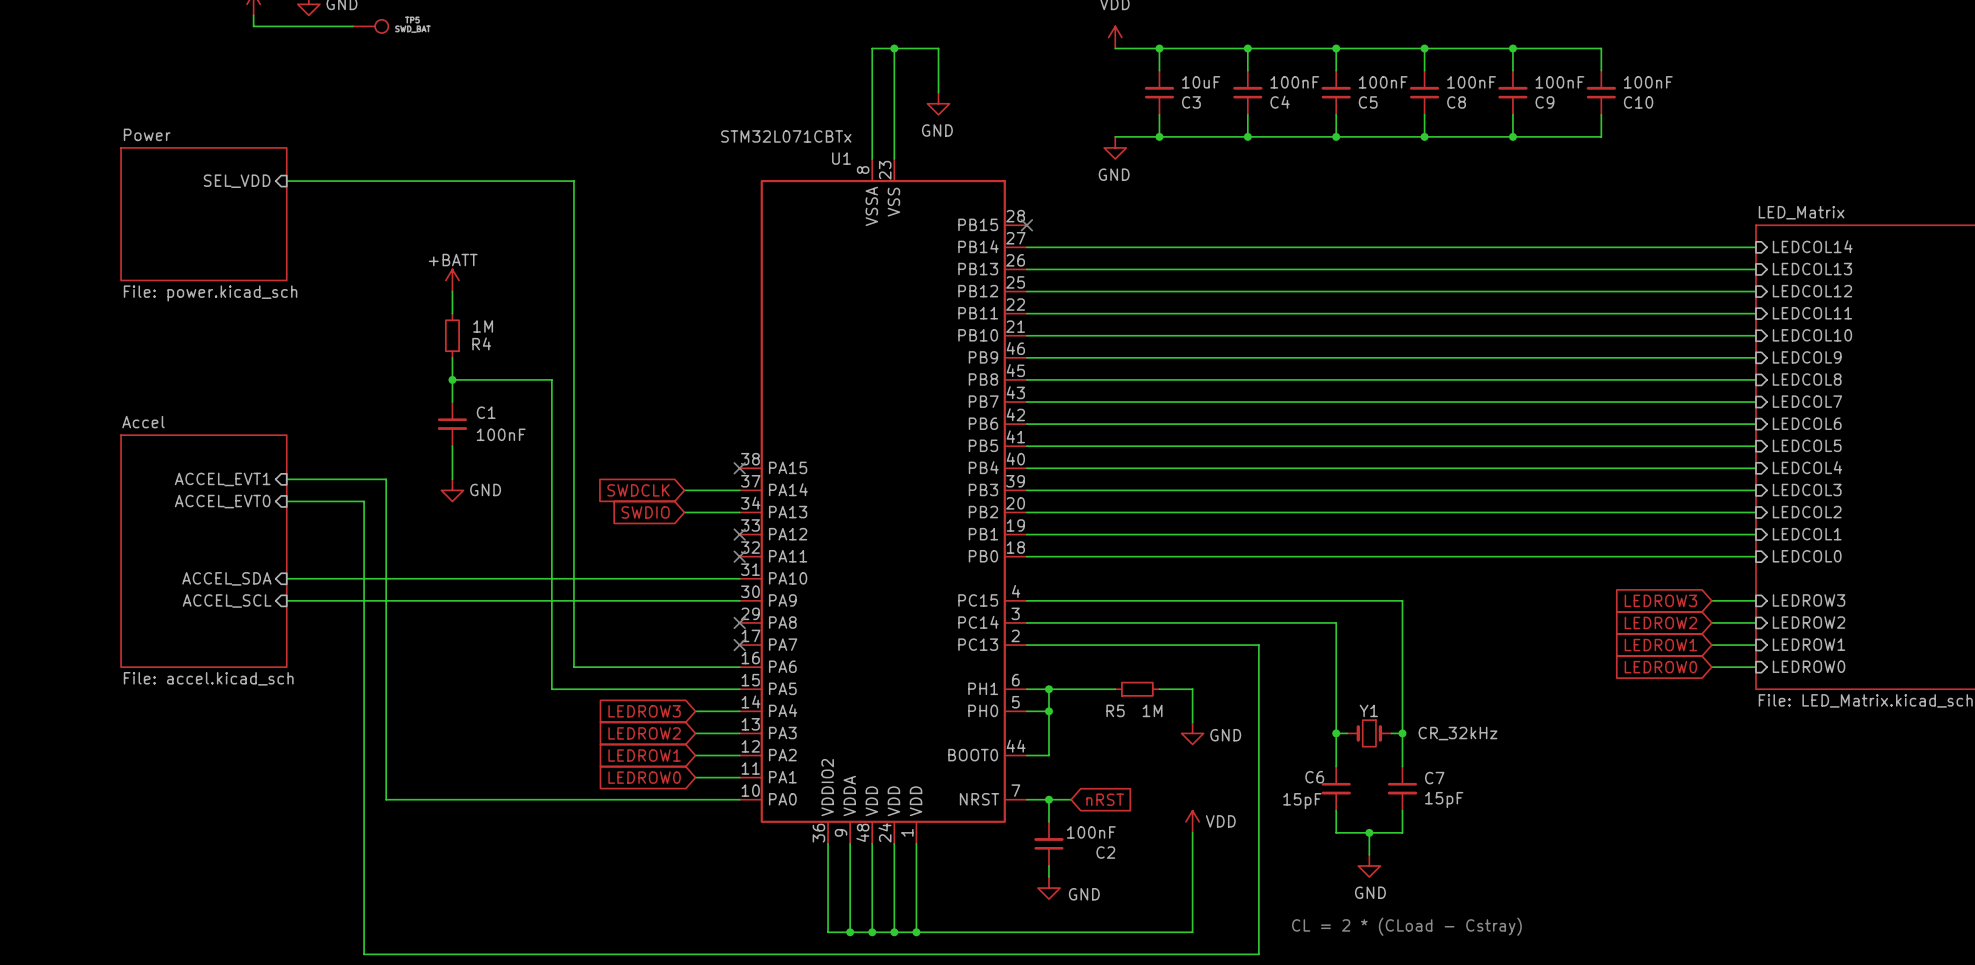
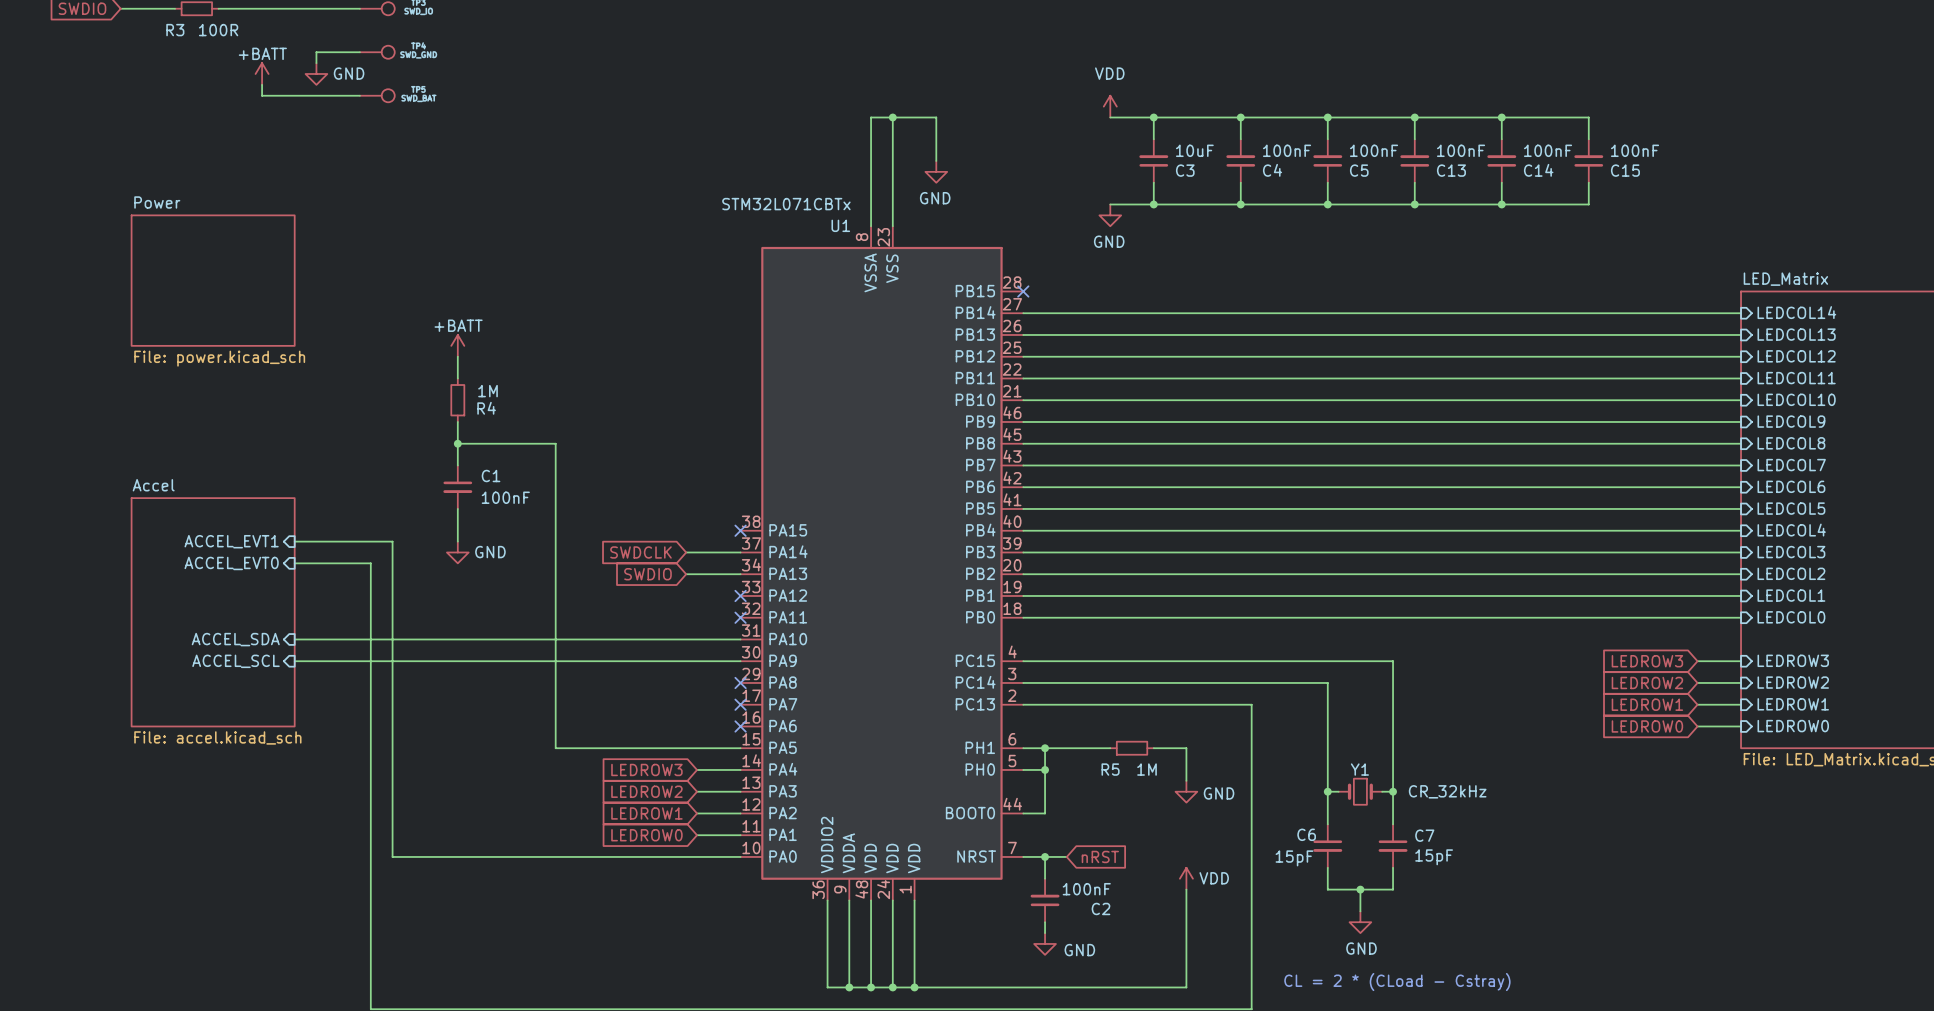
C8 name: C8 (1456, 102) -> C13 (1451, 170)
C9 name: C9 (1544, 102) -> C14 (1538, 170)
C10 name: C10 (1638, 102) -> C15 (1625, 170)
sheet pin: SEL_VDD (237, 181) -> none
wire: (286, 181) (573, 181) (573, 667) (739, 667) -> none
no-connect mark: none -> (740, 726)

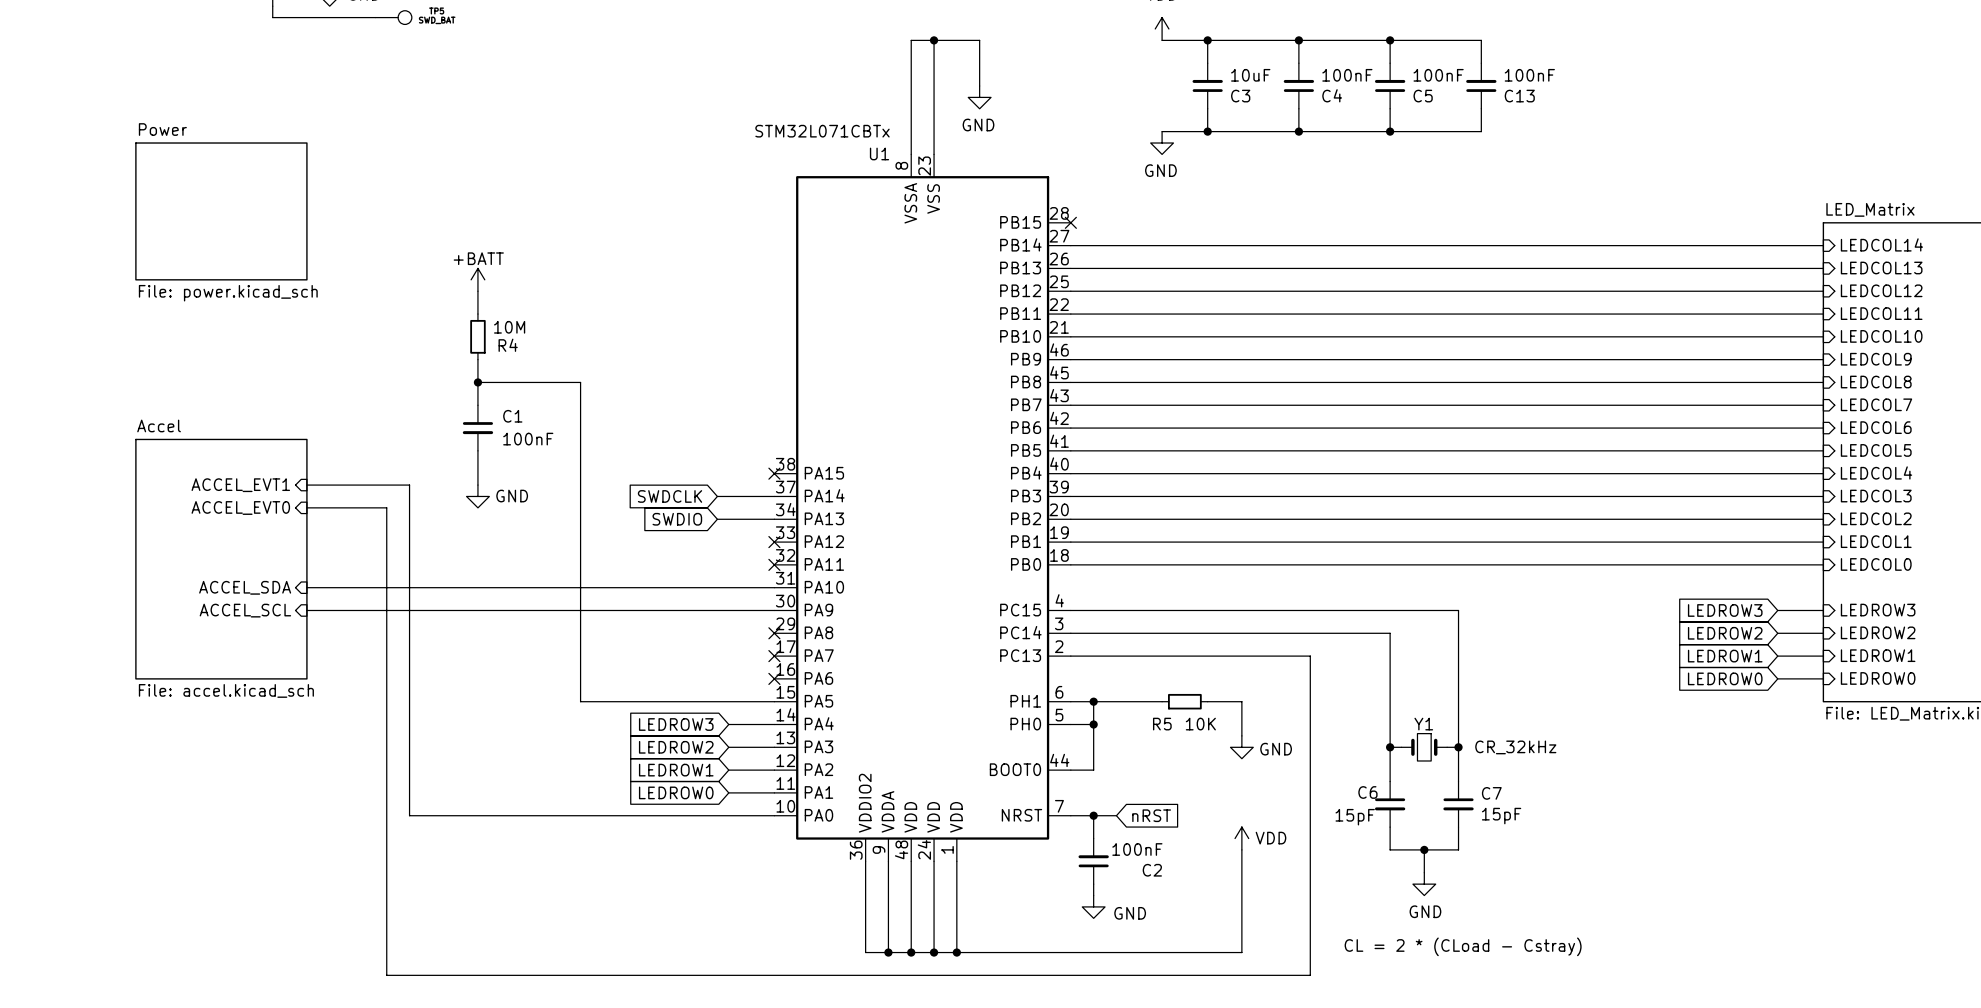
wire: (1414, 117) (1588, 117) (1588, 139) -> none
junction: (1414, 117) -> none
wire: (1501, 117) (1501, 139) -> none
junction: (1501, 117) -> none
C14: 100nF (1501, 160) -> none
C15: 100nF (1588, 160) -> none
wire: (1501, 182) (1501, 204) -> none
wire: (1588, 182) (1588, 204) (1414, 204) -> none
junction: (1414, 204) -> none
junction: (1501, 204) -> none
R4 value: 1M (488, 391) -> 10M (509, 327)
R5 value: 1M (1147, 769) -> 10K (1200, 724)

